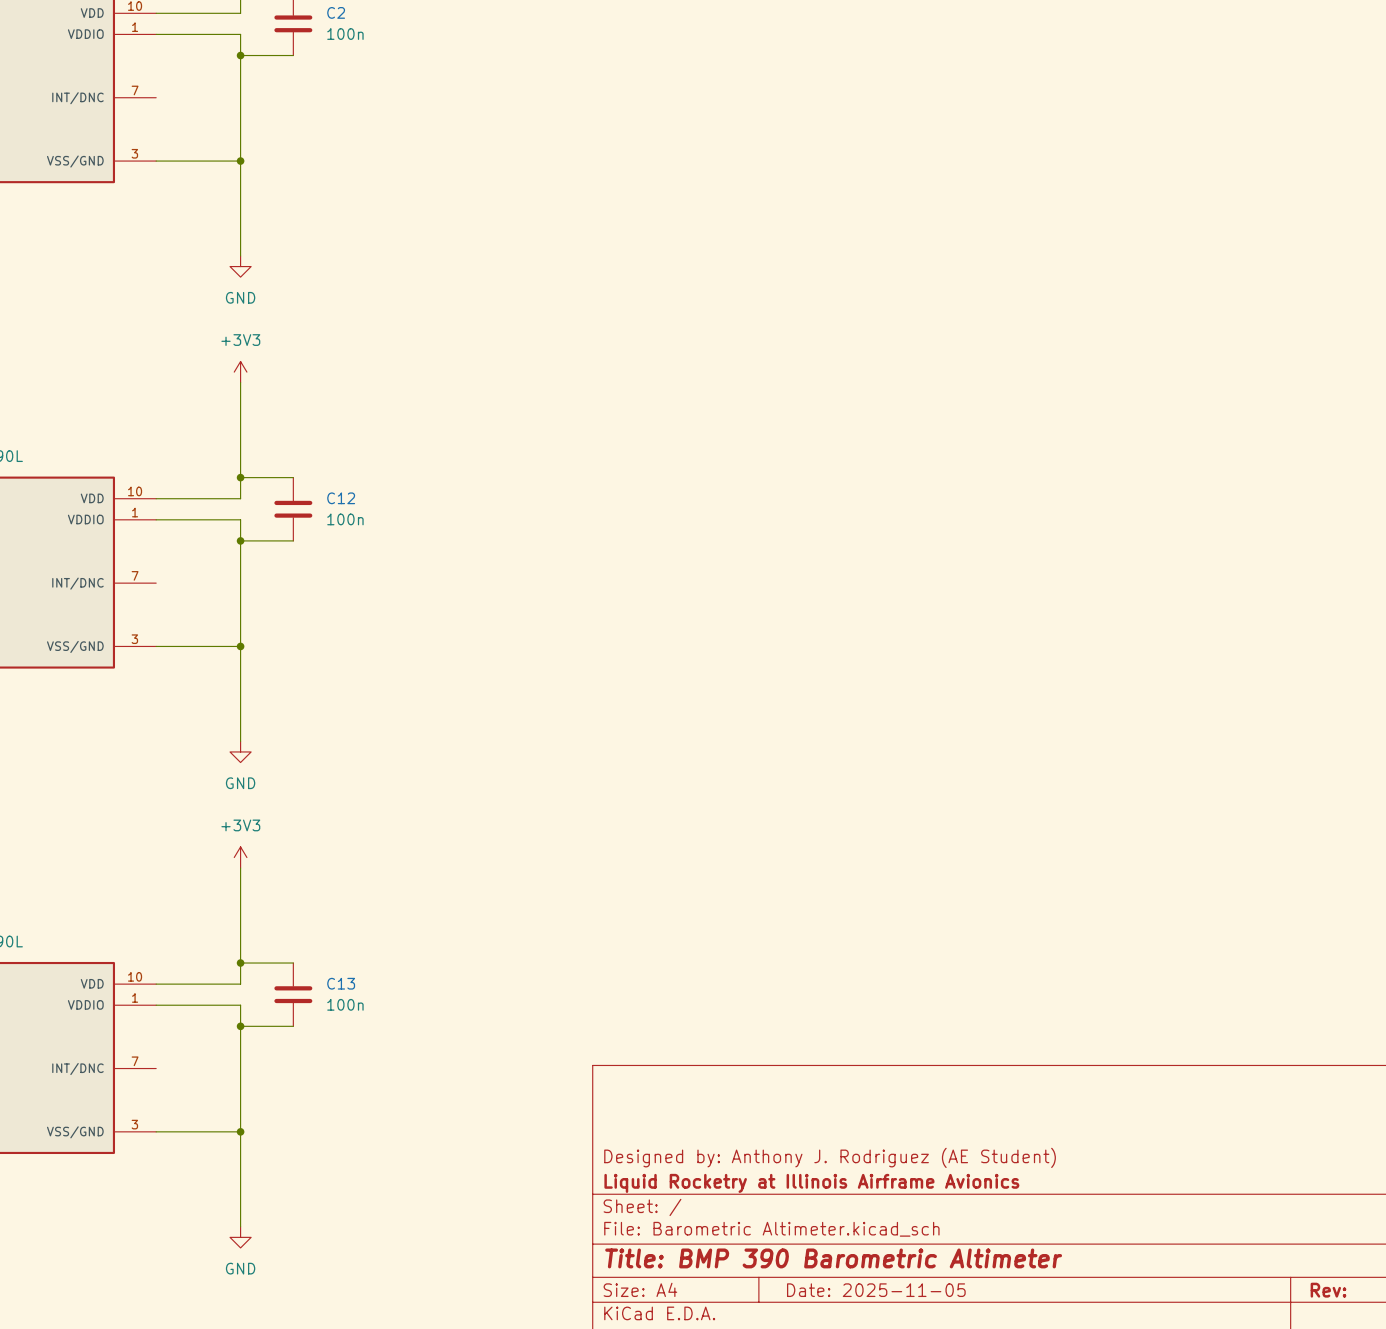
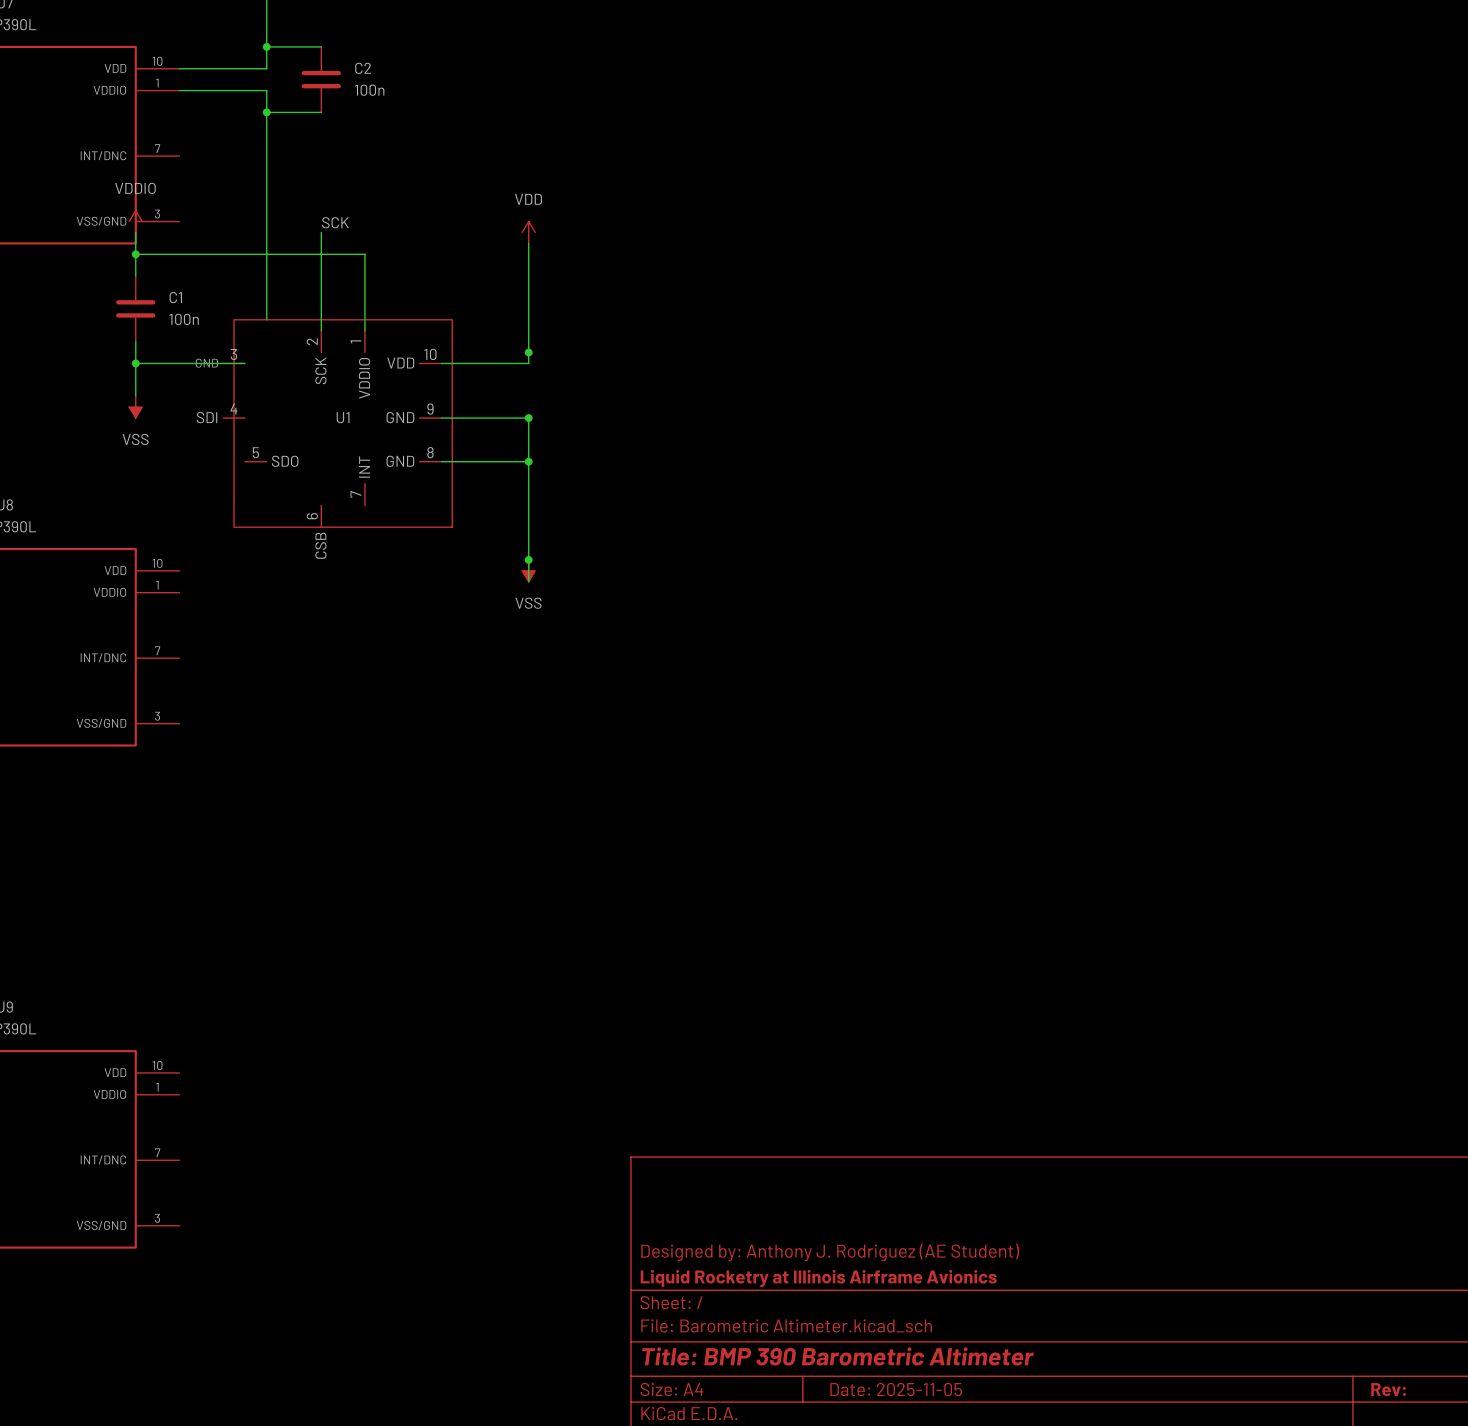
power symbol: none -> VDDIO (135, 221)
wire: (156, 161) (240, 161) -> none
junction: (240, 161) -> none
label: none -> SCK (335, 222)
wire: none -> (135, 232) (135, 276)
wire: none -> (321, 232) (321, 330)
power symbol: none -> VDD (528, 232)
wire: none -> (528, 243) (528, 363) (441, 363)
wire: none -> (135, 254) (364, 254) (364, 330)
junction: none -> (135, 254)
C1: none -> 100n (135, 308)
power symbol: GND (240, 266) -> none
wire: none -> (135, 341) (135, 396)
junction: none -> (528, 352)
wire: none -> (135, 363) (244, 363)
junction: none -> (135, 363)
power symbol: none -> VSS (135, 407)
wire: none -> (441, 418) (528, 418) (528, 581)
junction: none -> (528, 418)
U1: none -> (337, 423)
power symbol: +3V3 (240, 372) -> none
wire: (240, 382) (240, 498) (156, 498) -> none
wire: none -> (441, 461) (528, 461)
junction: none -> (528, 461)
wire: (240, 477) (293, 477) -> none
junction: (240, 477) -> none
junction: none -> (528, 559)
power symbol: none -> VSS (528, 570)
C12: 100n (293, 509) -> none
wire: (156, 519) (240, 519) (240, 741) -> none
wire: (240, 540) (293, 540) -> none
junction: (240, 540) -> none
wire: (156, 646) (240, 646) -> none
junction: (240, 646) -> none
power symbol: GND (240, 751) -> none
power symbol: +3V3 (240, 857) -> none
wire: (240, 868) (240, 984) (156, 984) -> none
wire: (240, 963) (293, 963) -> none
junction: (240, 963) -> none
C13: 100n (293, 994) -> none
wire: (156, 1005) (240, 1005) (240, 1226) -> none
wire: (240, 1026) (293, 1026) -> none
junction: (240, 1026) -> none
wire: (156, 1131) (240, 1131) -> none
junction: (240, 1131) -> none
power symbol: GND (240, 1237) -> none

